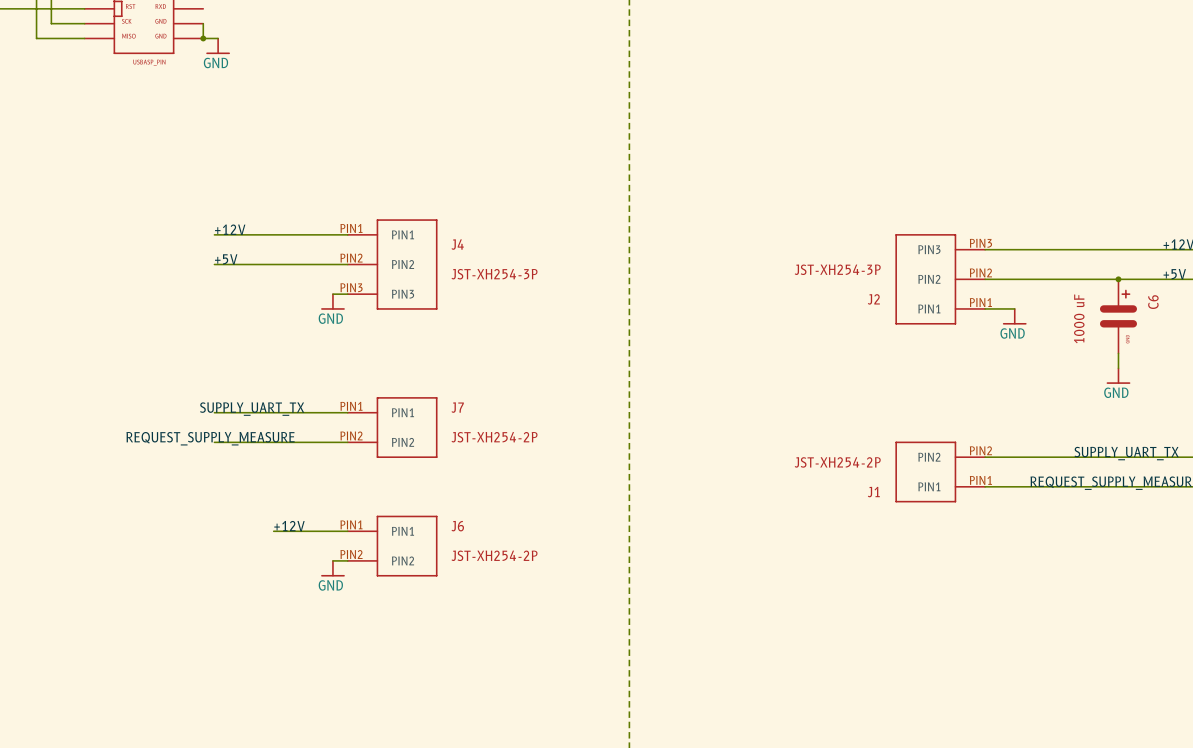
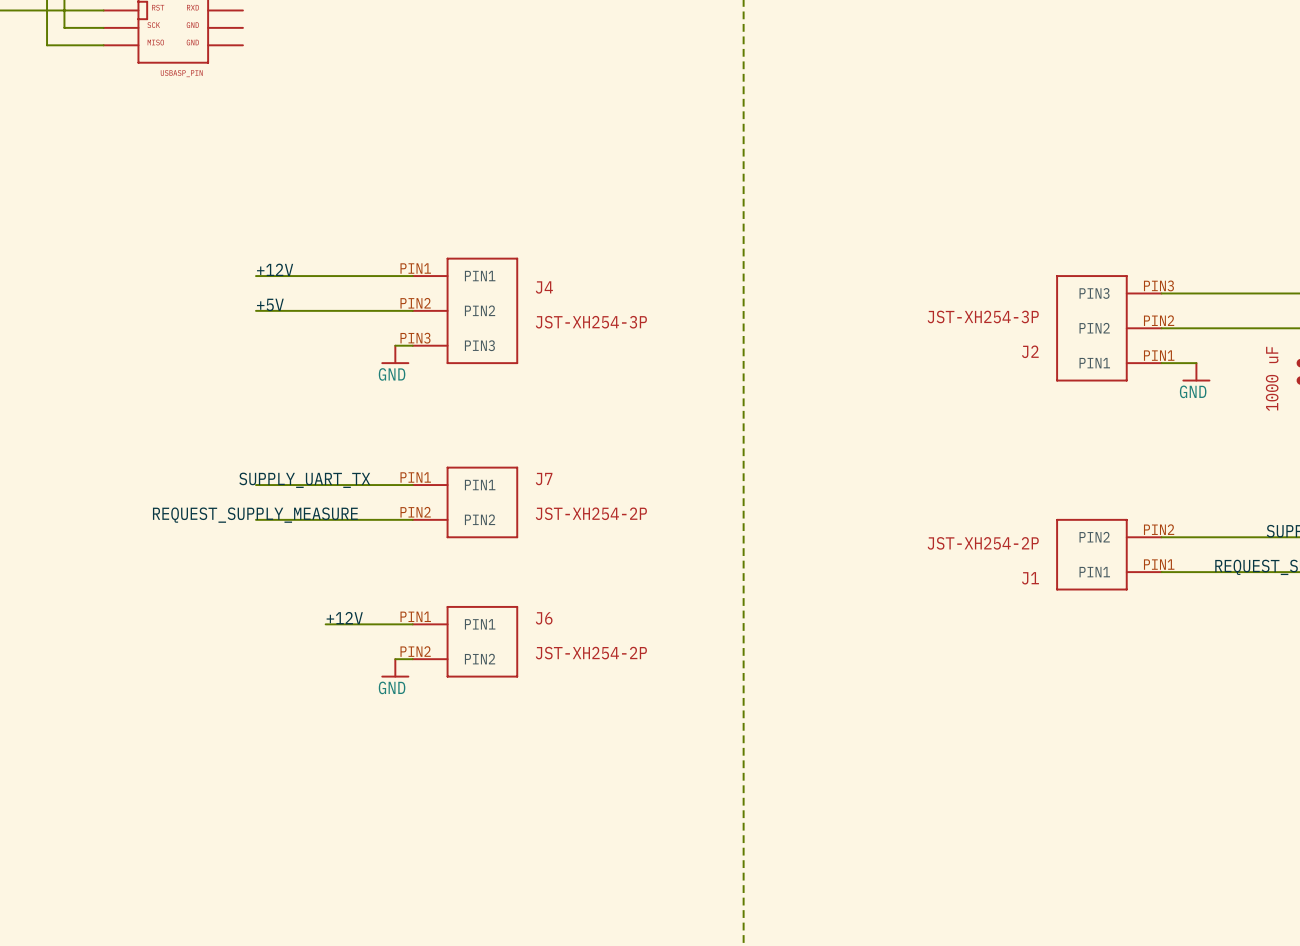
wire: (203, 23) (203, 38) (218, 38) -> none
junction: (203, 38) -> none
power symbol: GND (218, 46) -> none

